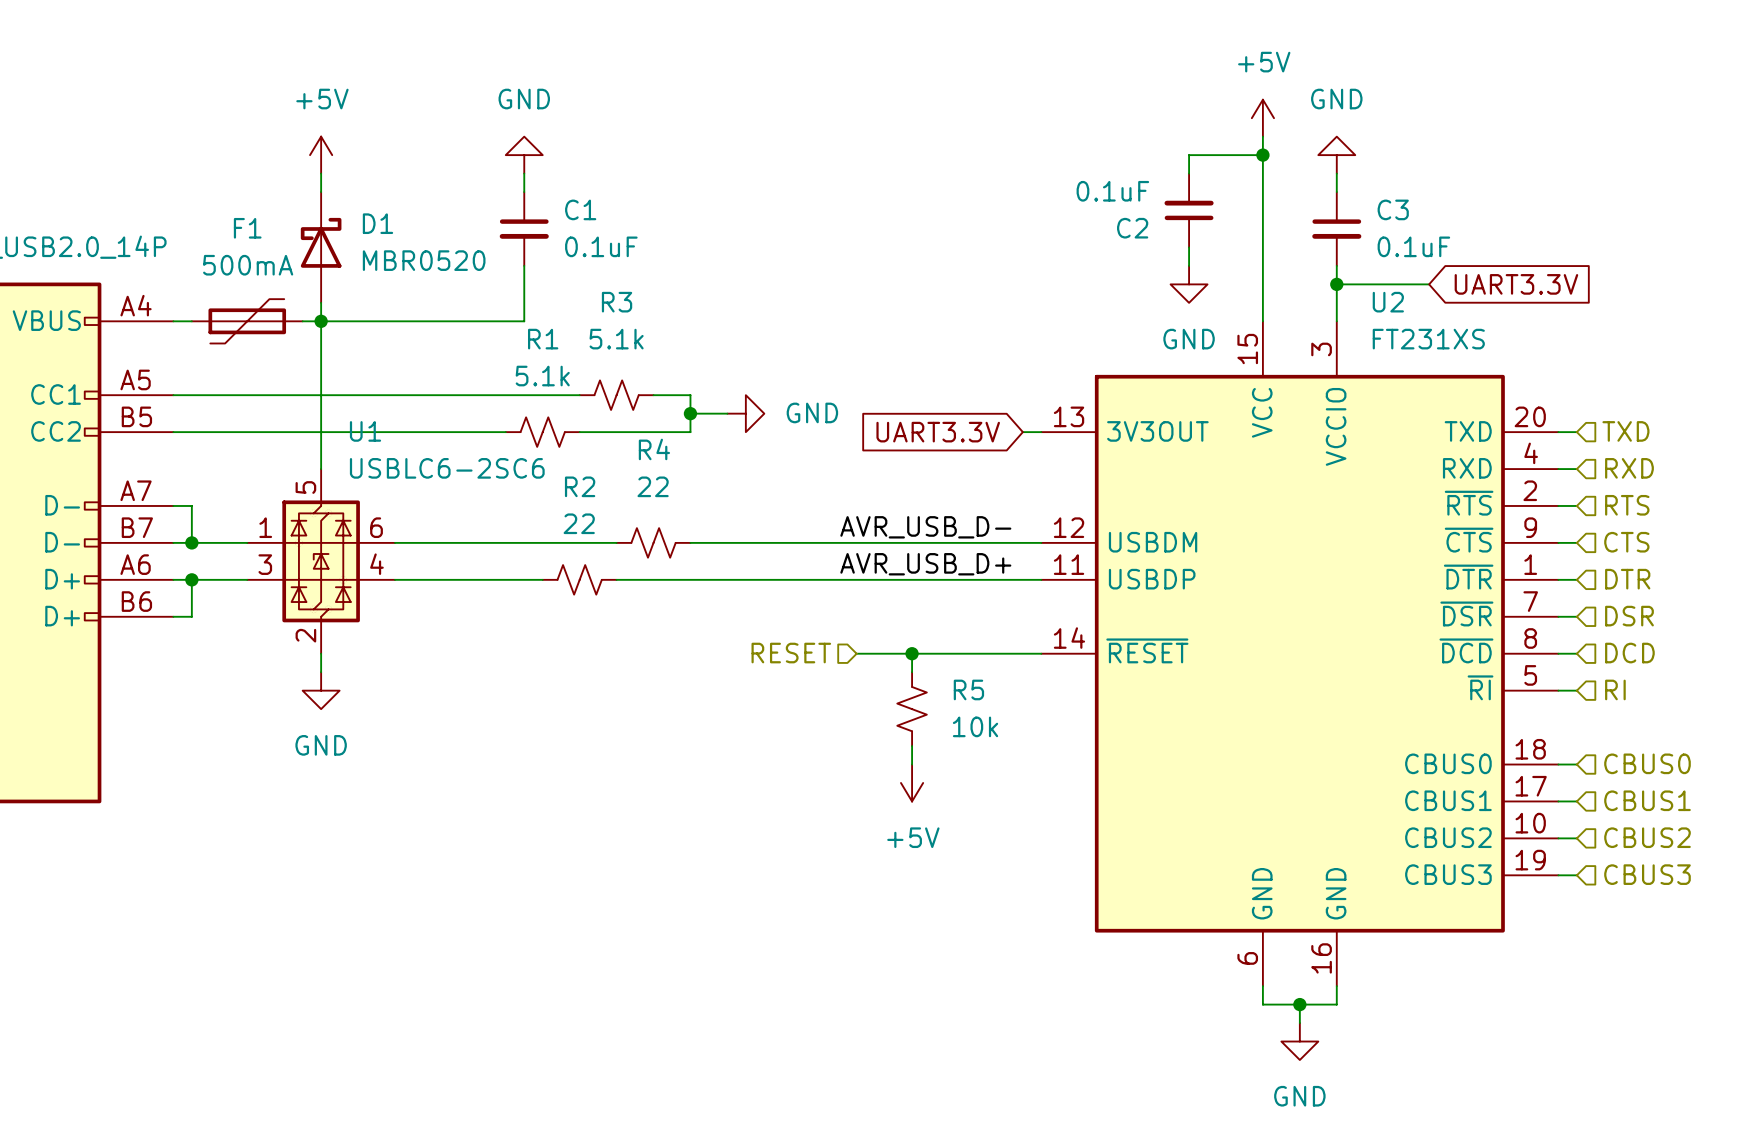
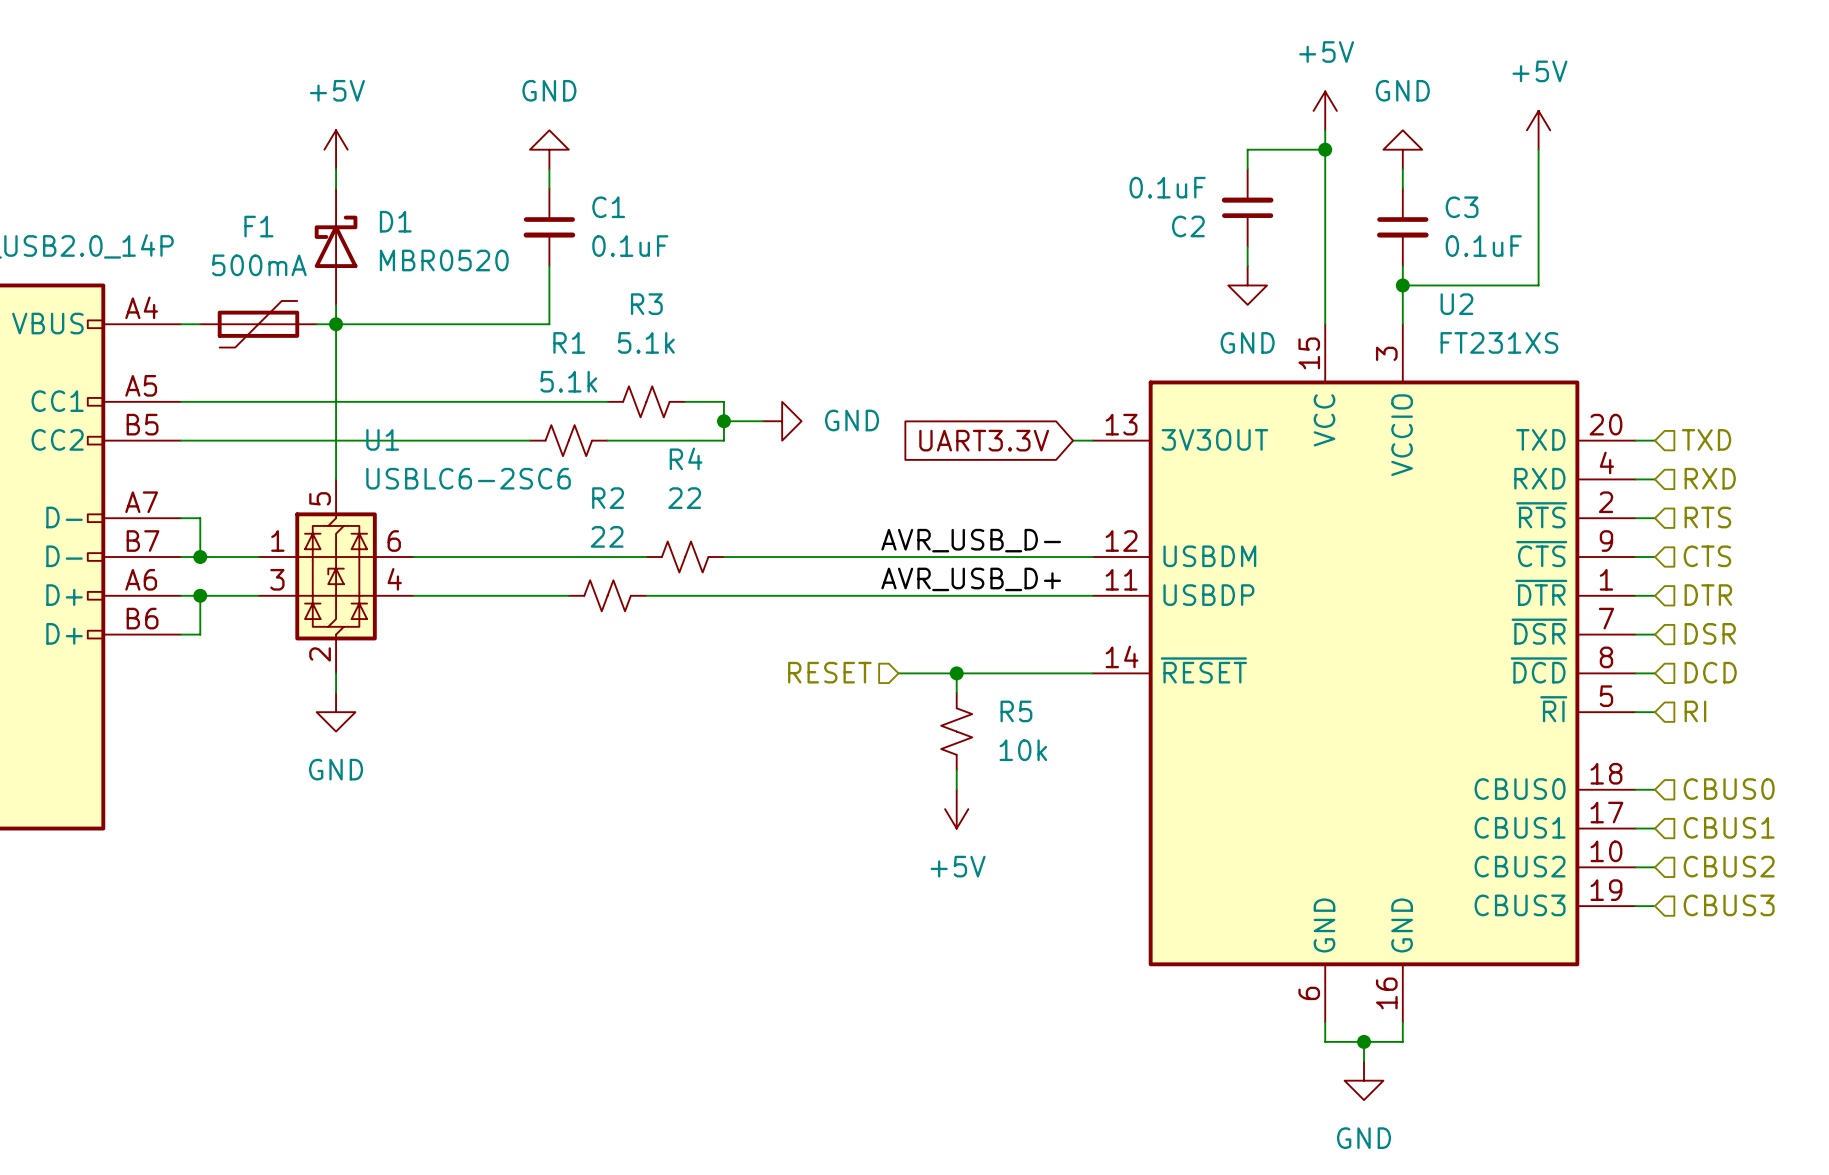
power symbol: none -> +5V (1538, 130)
wire: none -> (1538, 149) (1538, 285) (1499, 285)
global label: UART3.3V (1516, 284) -> none

